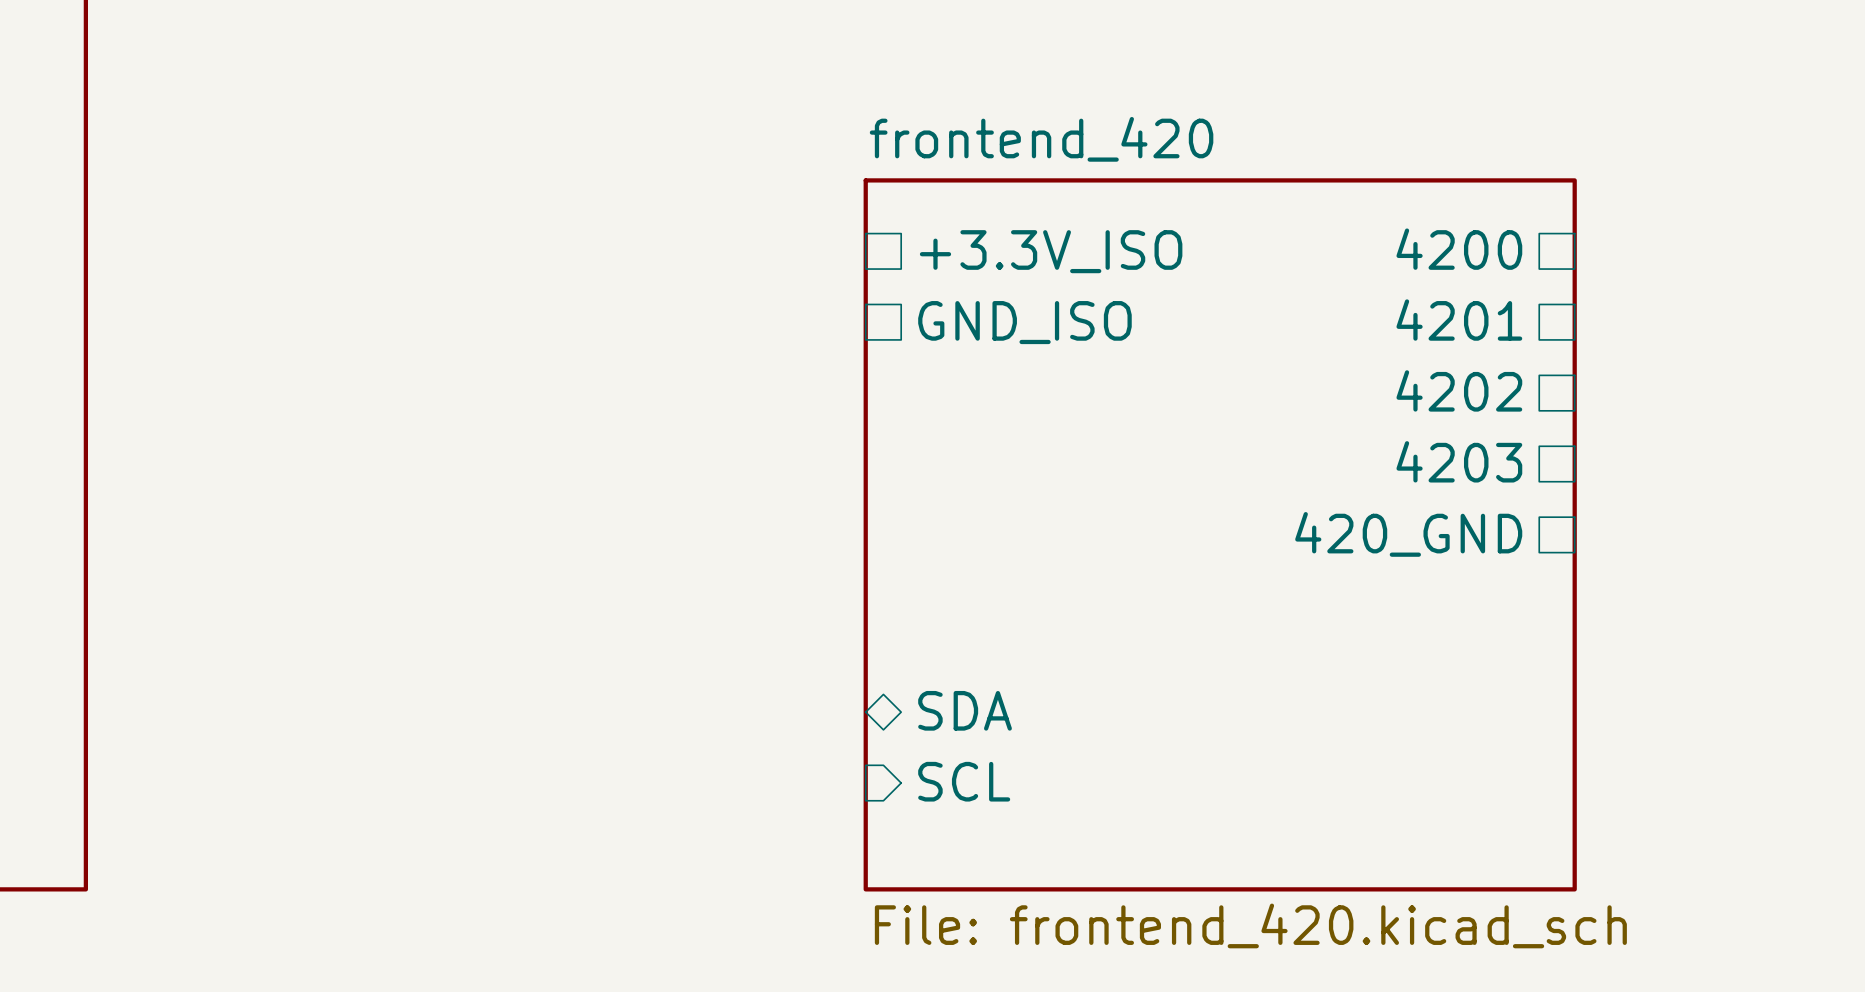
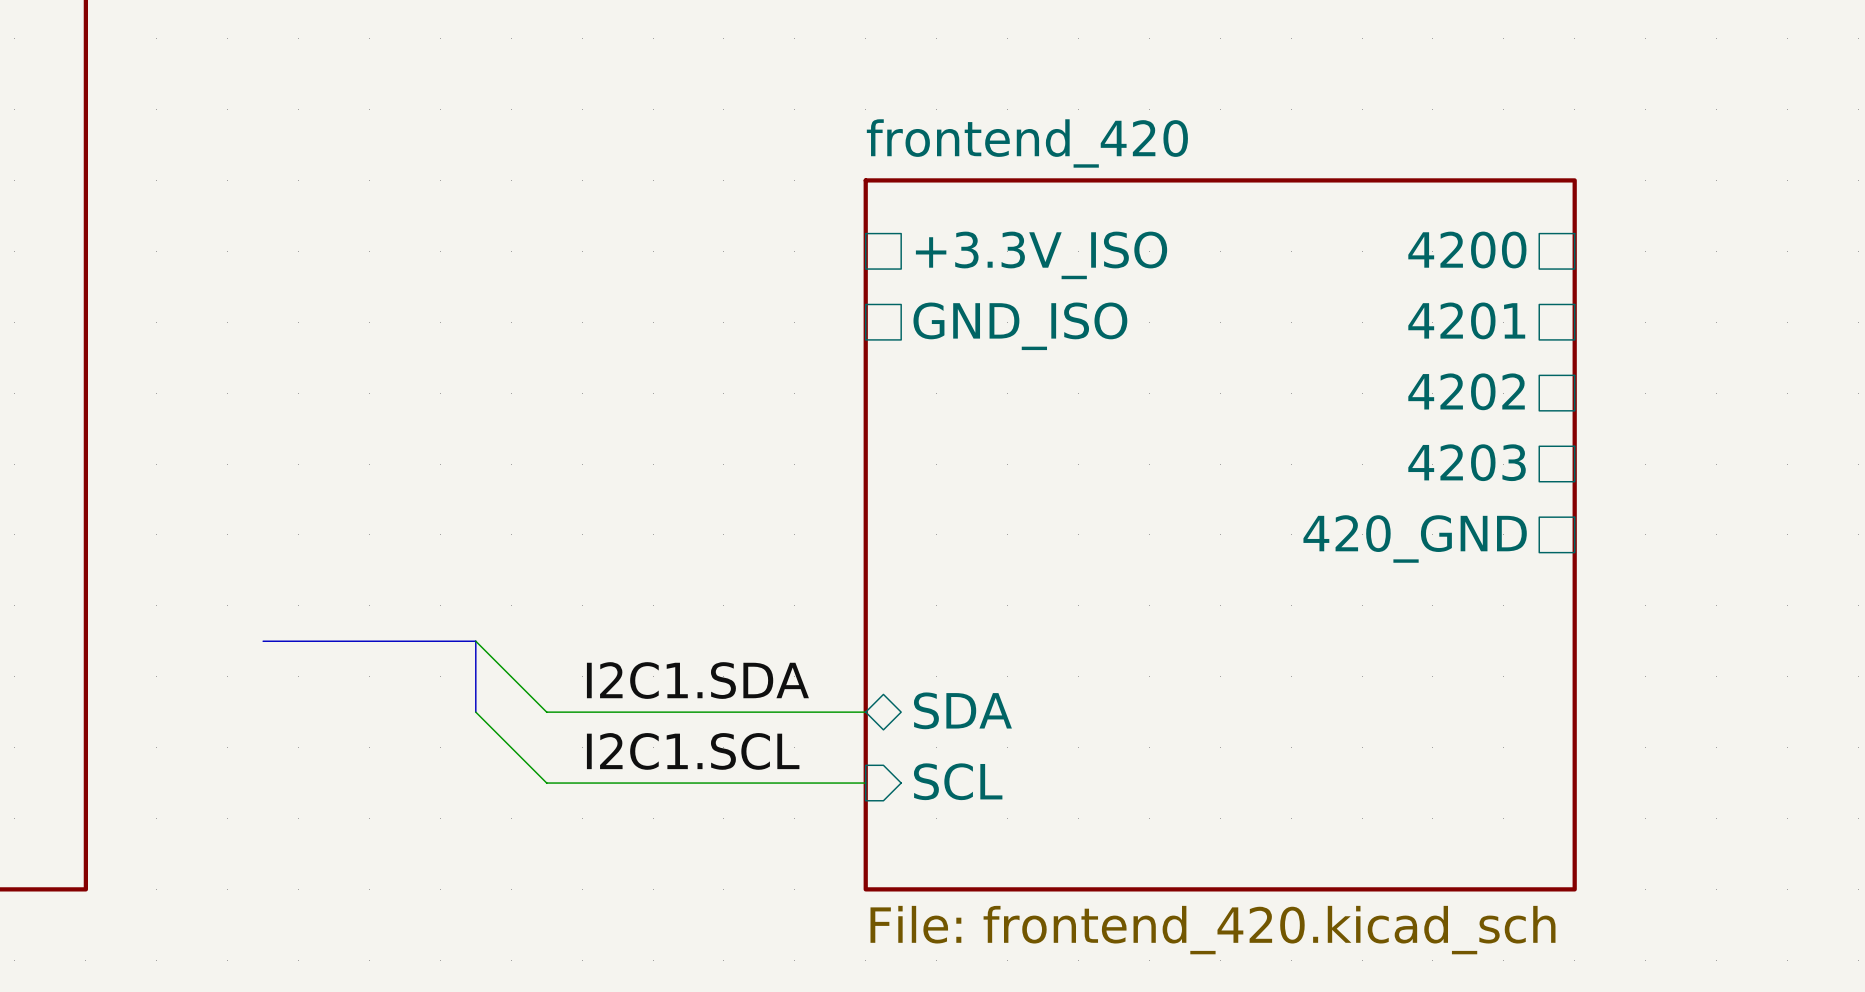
bus: none -> (263, 641) (475, 641) (475, 712)
wire: none -> (475, 641) (546, 712) (865, 712)
label: none -> I2C1.SDA (697, 680)
wire: none -> (475, 712) (546, 783) (865, 783)
label: none -> I2C1.SCL (693, 751)

